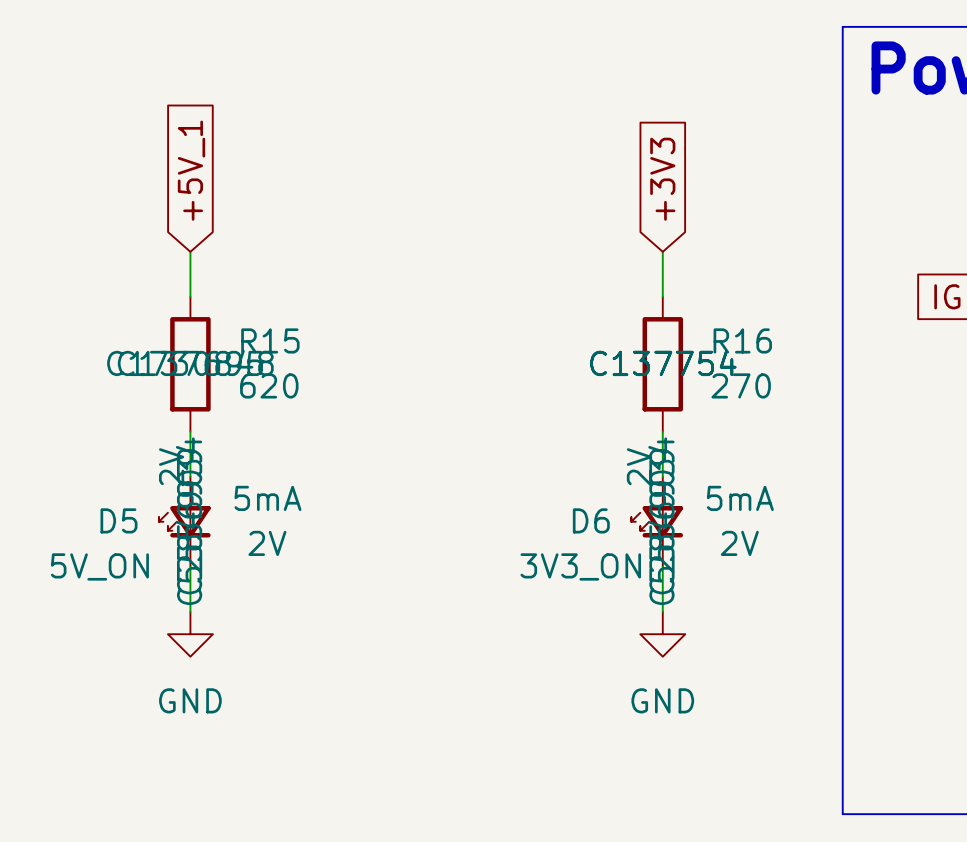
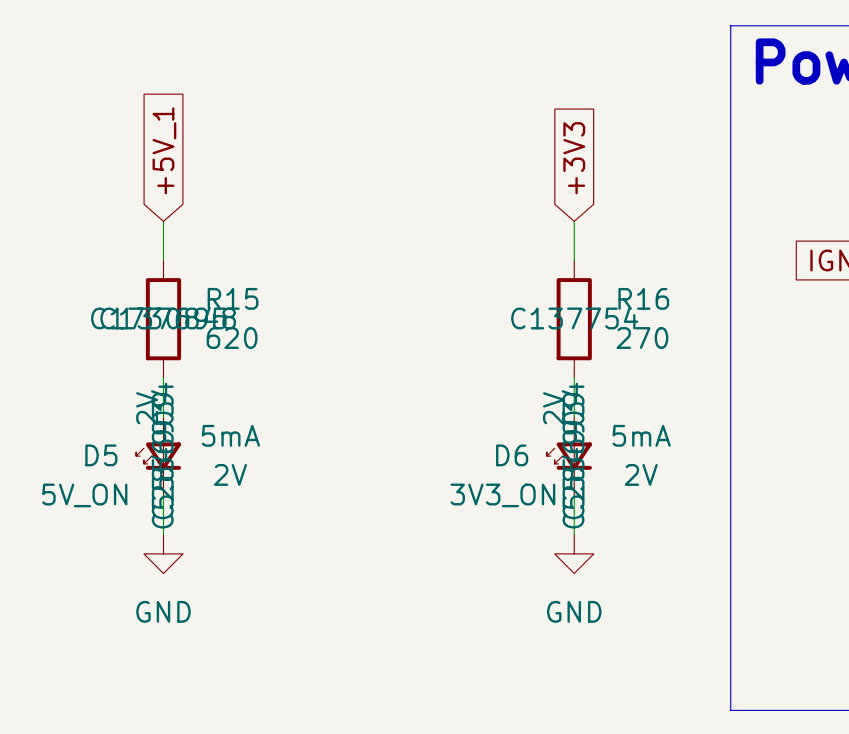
R16 text: C137754 (663, 362) -> none

